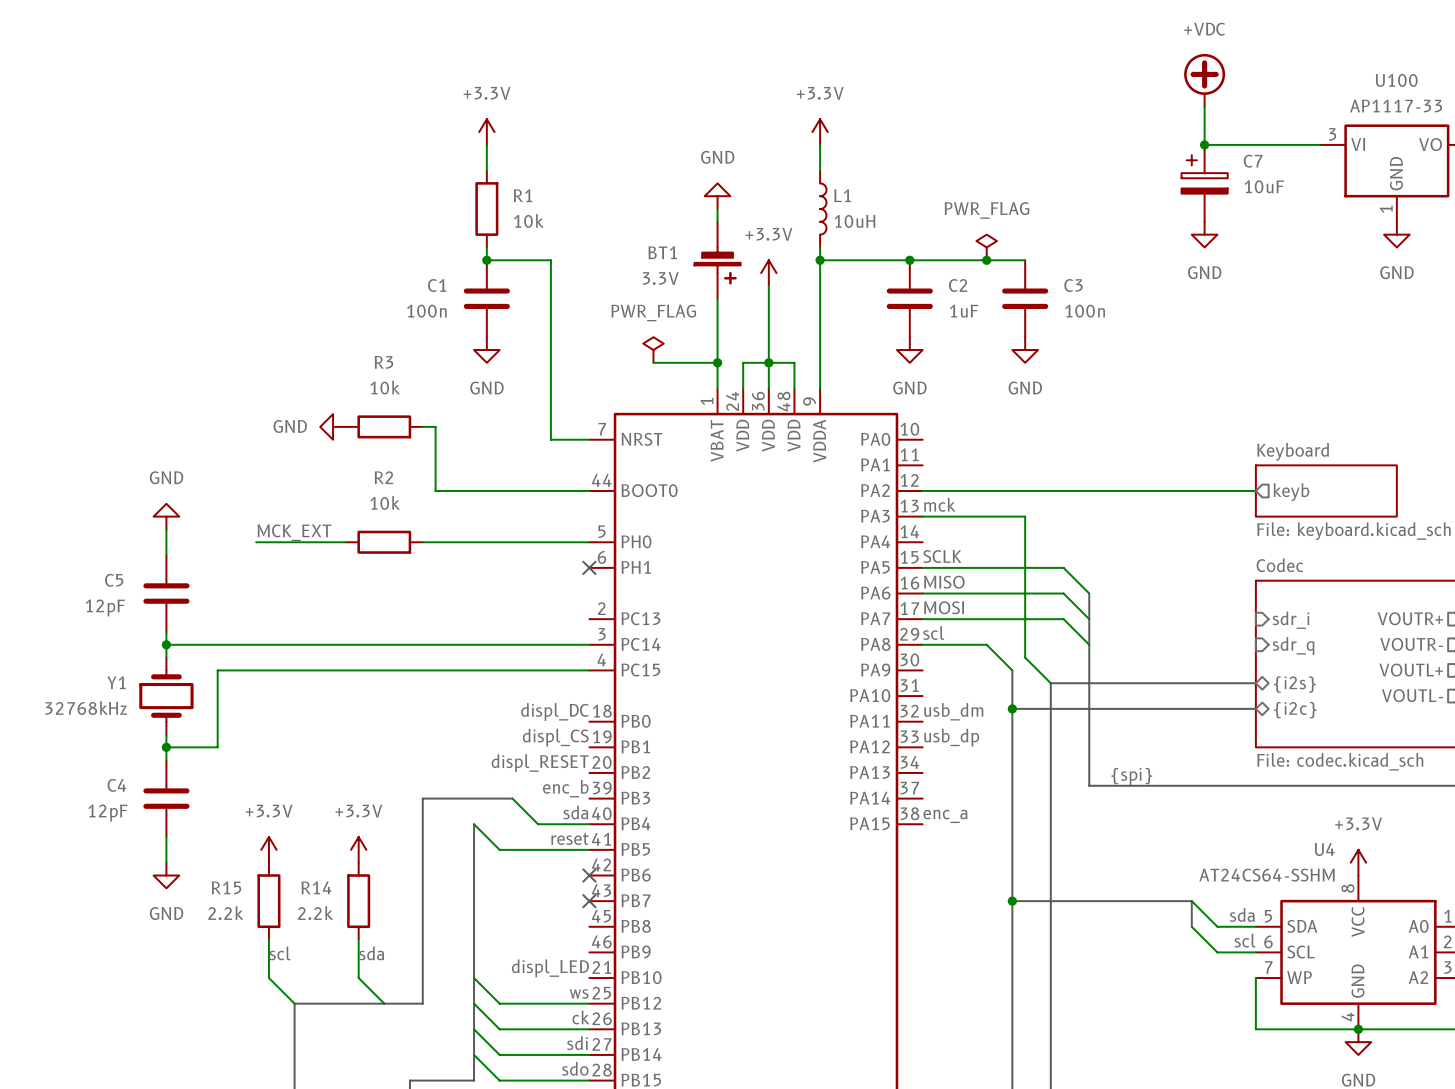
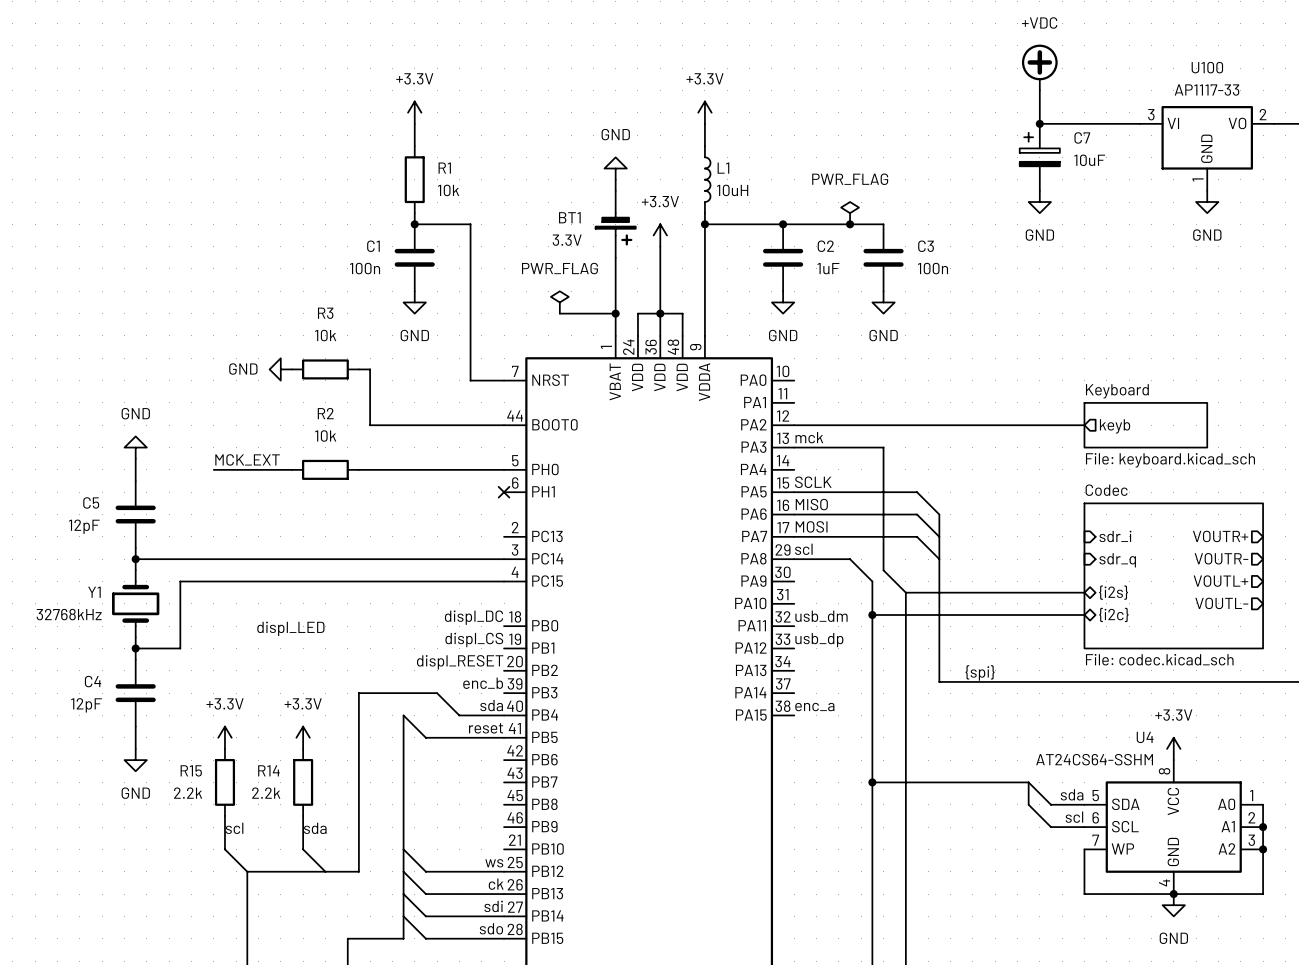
label: none -> displ_LED (290, 628)
no-connect mark: (589, 875) -> none
no-connect mark: (589, 901) -> none
label: displ_LED (550, 968) -> none

